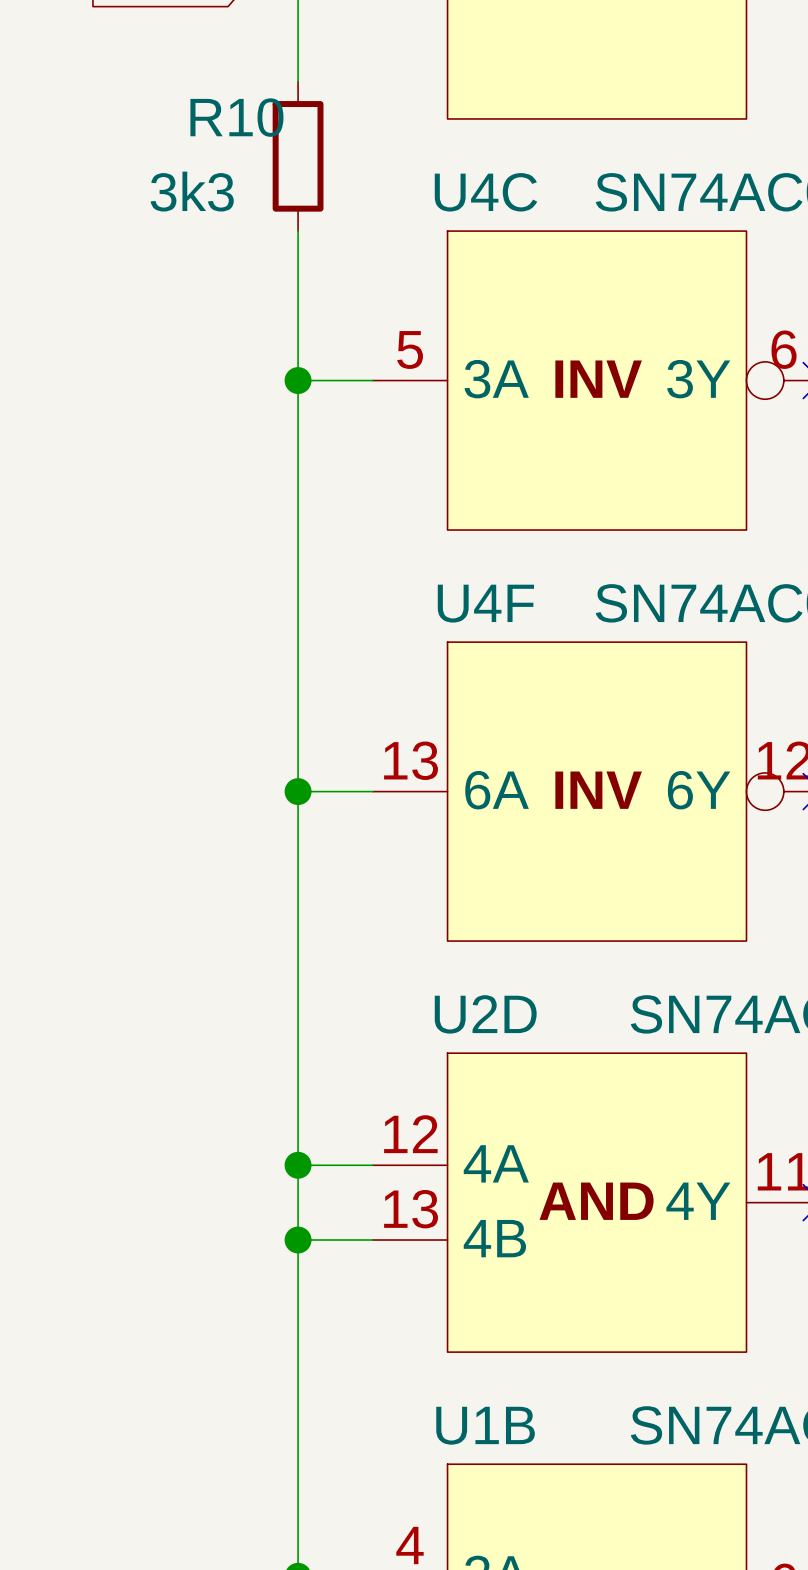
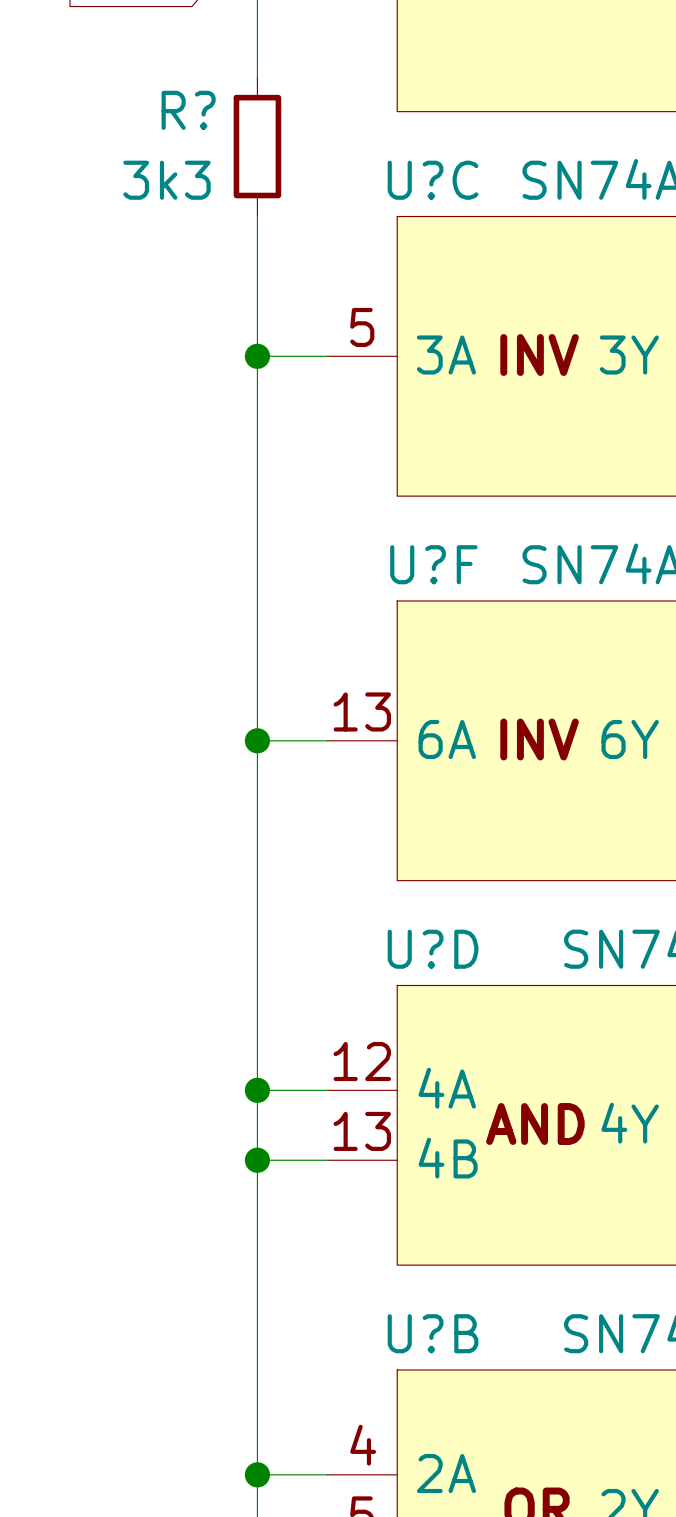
R10 name: R10 (236, 117) -> R? (188, 110)
U4C name: U4C (485, 192) -> U?C (433, 180)
U4F name: U4F (485, 603) -> U?F (433, 564)
U2D name: U2D (485, 1014) -> U?D (433, 949)
U1B name: U1B (485, 1425) -> U?B (433, 1333)

